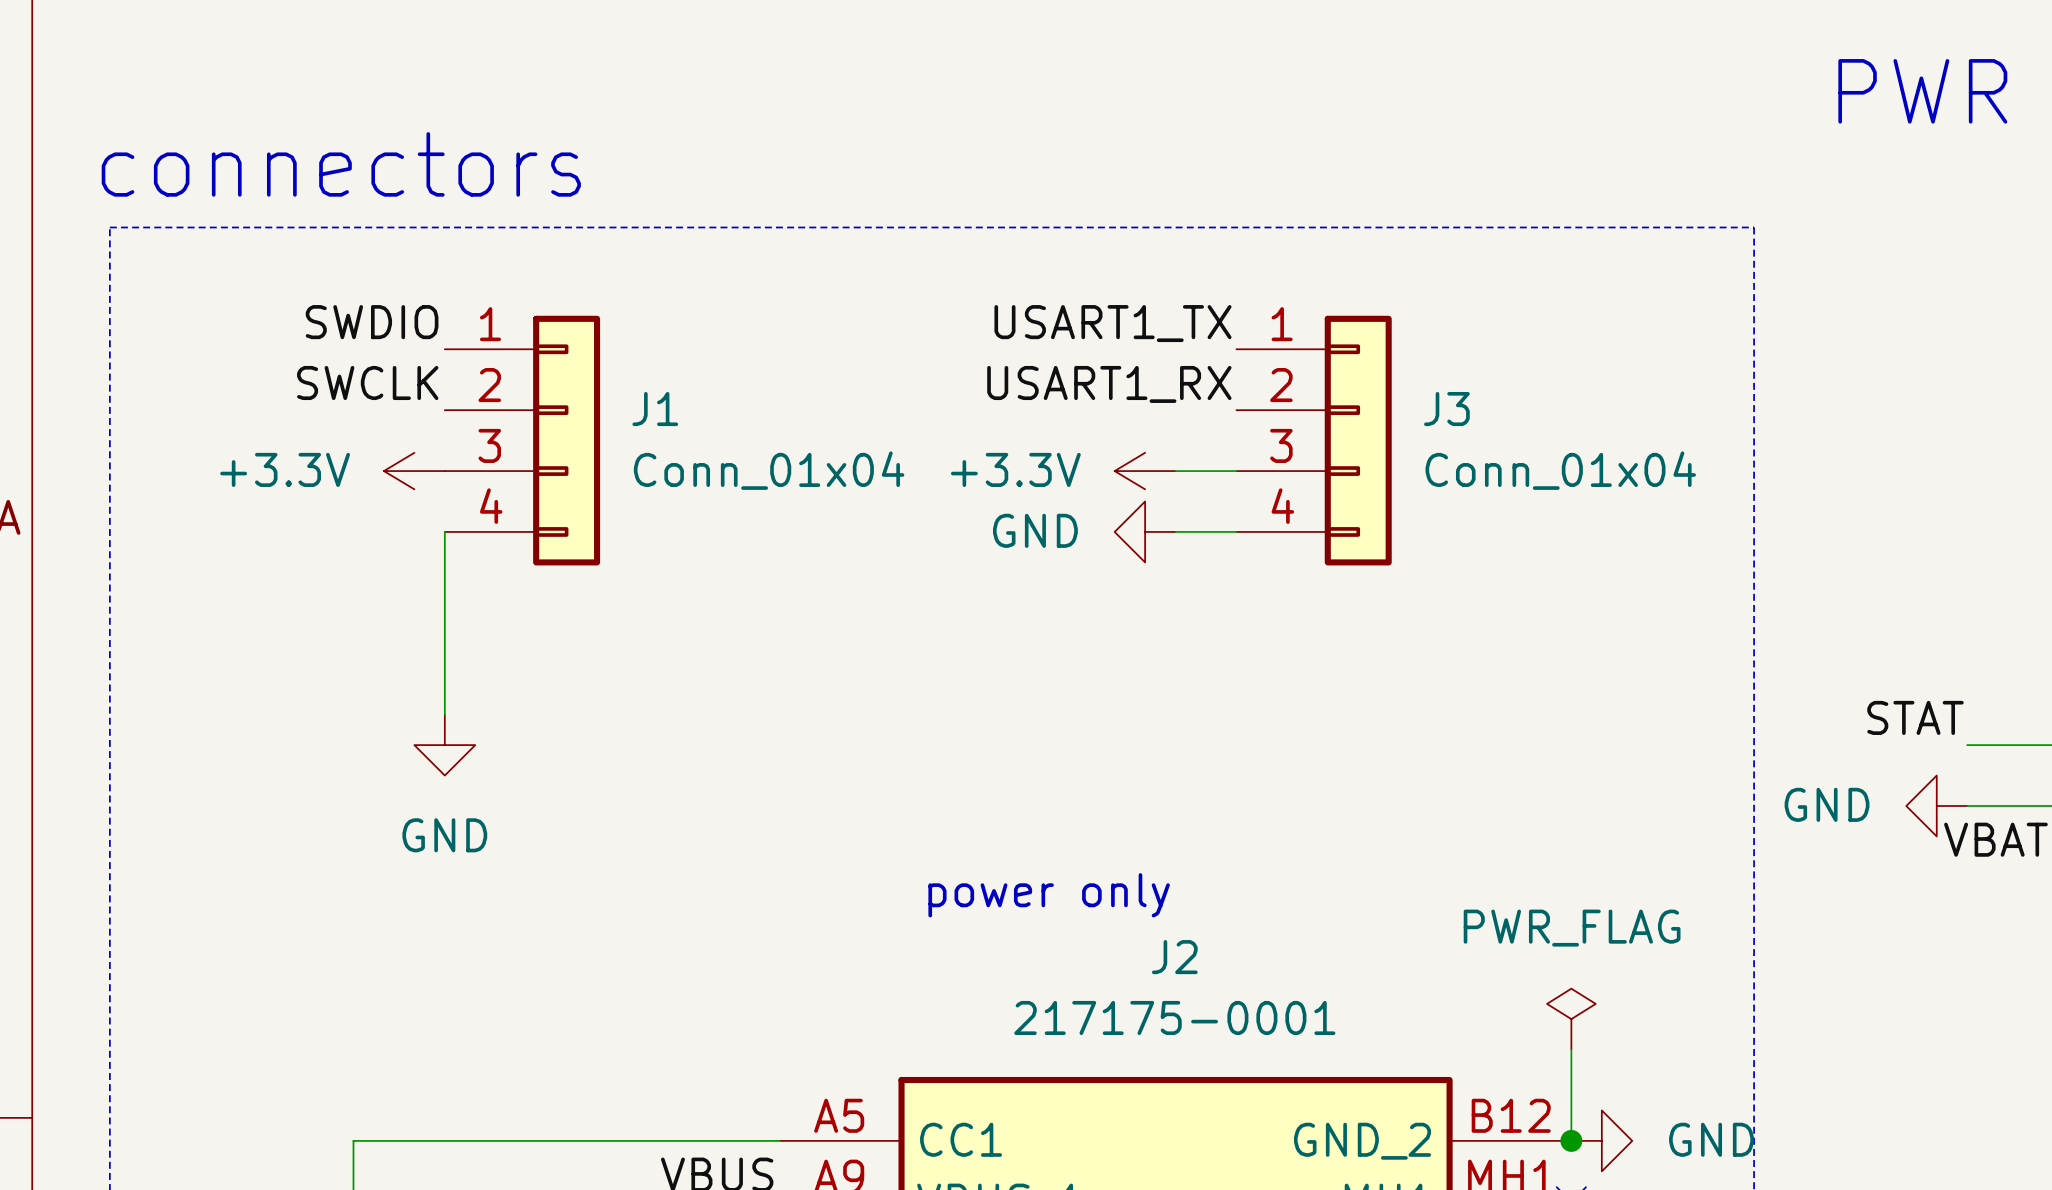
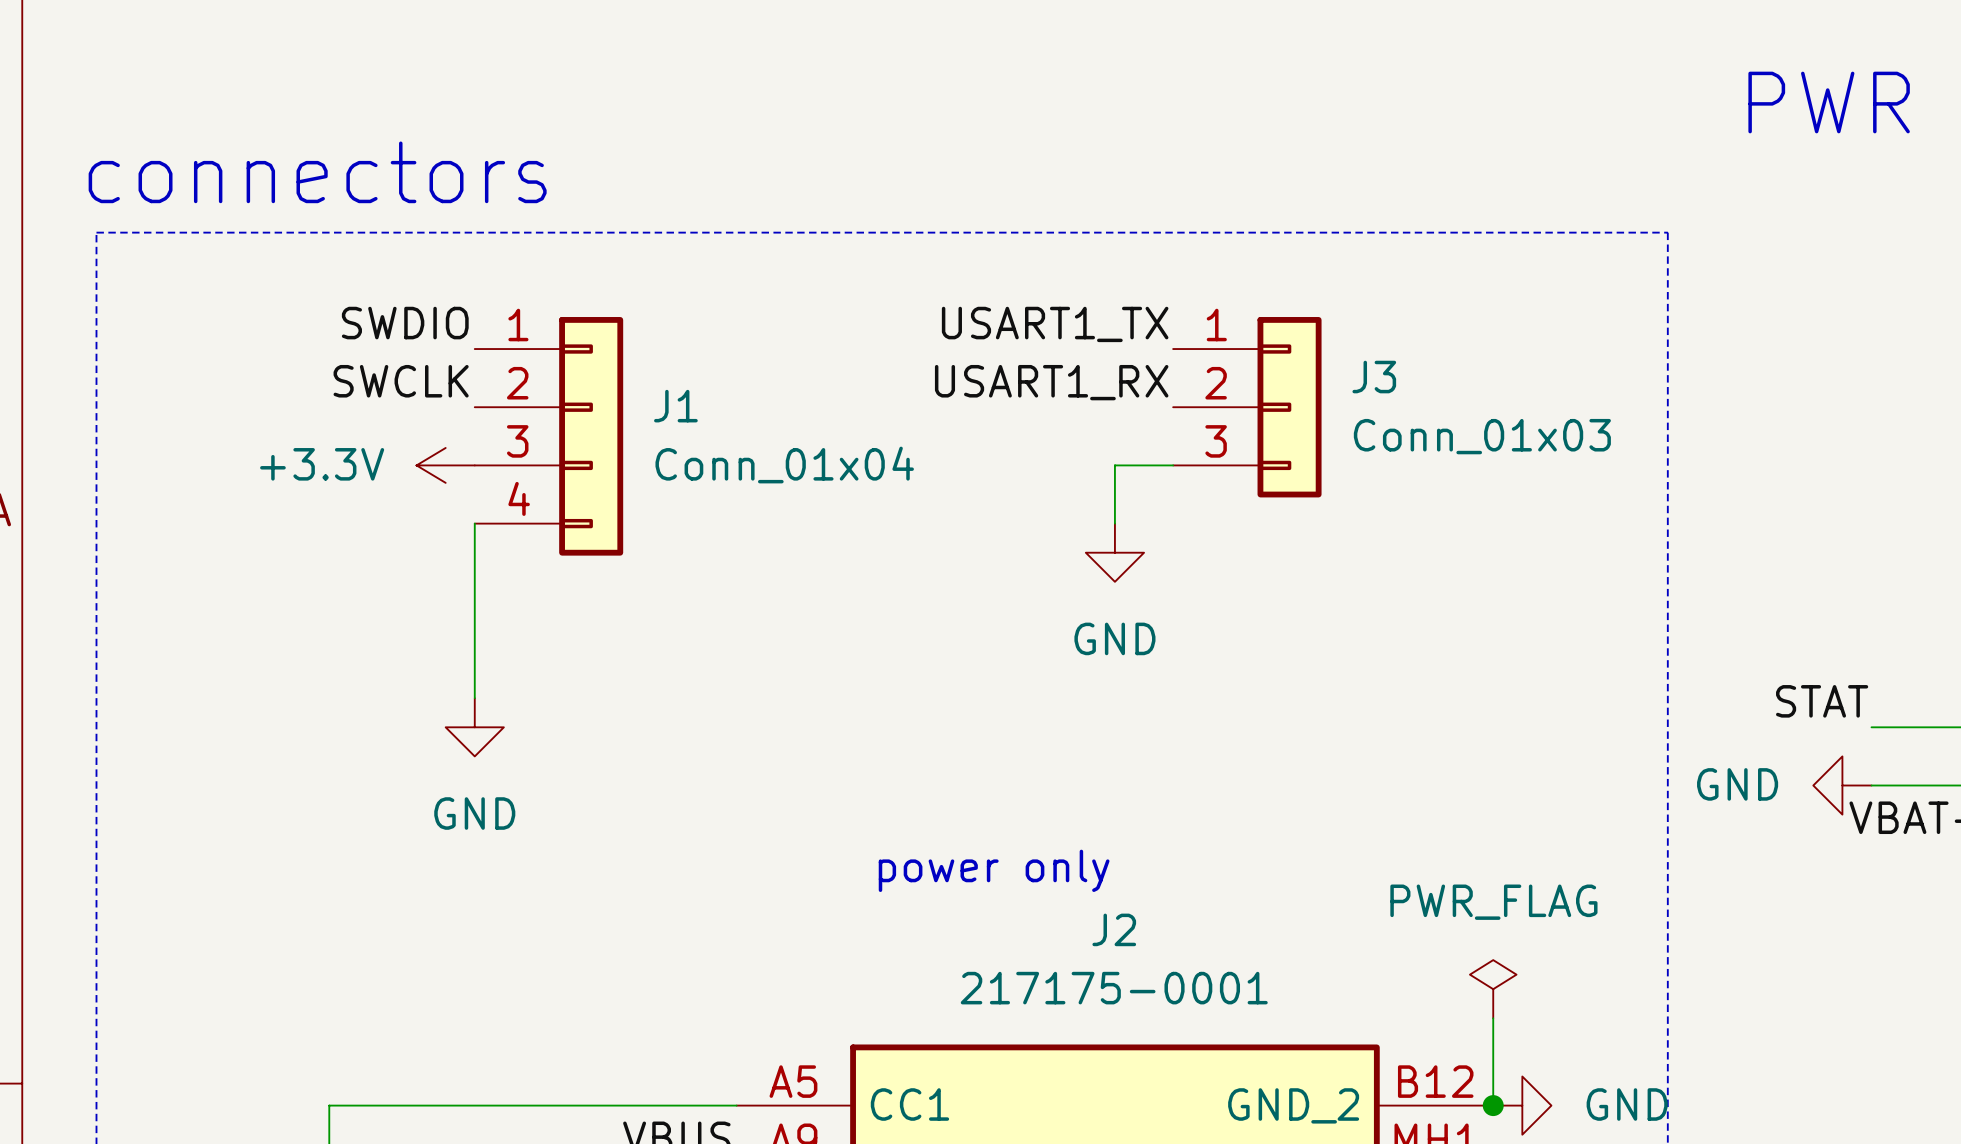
J3 symbol: [1236, 315, 1392, 566] -> [1173, 317, 1322, 498]
label position: SWDIO (372, 322) -> SWDIO (405, 323)
label position: SWCLK (367, 383) -> SWCLK (401, 381)
J1 position: (522, 440) -> (548, 436)
J3 value: Conn_01x04 (1560, 470) -> Conn_01x03 (1482, 436)
power symbol position: +3.3V (414, 471) -> +3.3V (445, 465)
power symbol: +3.3V (1145, 471) -> none
wire: (444, 531) (444, 714) -> (474, 523) (474, 698)
power symbol rotation: 0° (1145, 531) -> 90° counterclockwise (1114, 552)
power symbol position: GND (1145, 531) -> GND (1114, 552)
wire: (1175, 531) (1236, 531) -> (1114, 523) (1114, 465)
power symbol position: GND (444, 745) -> GND (474, 727)

